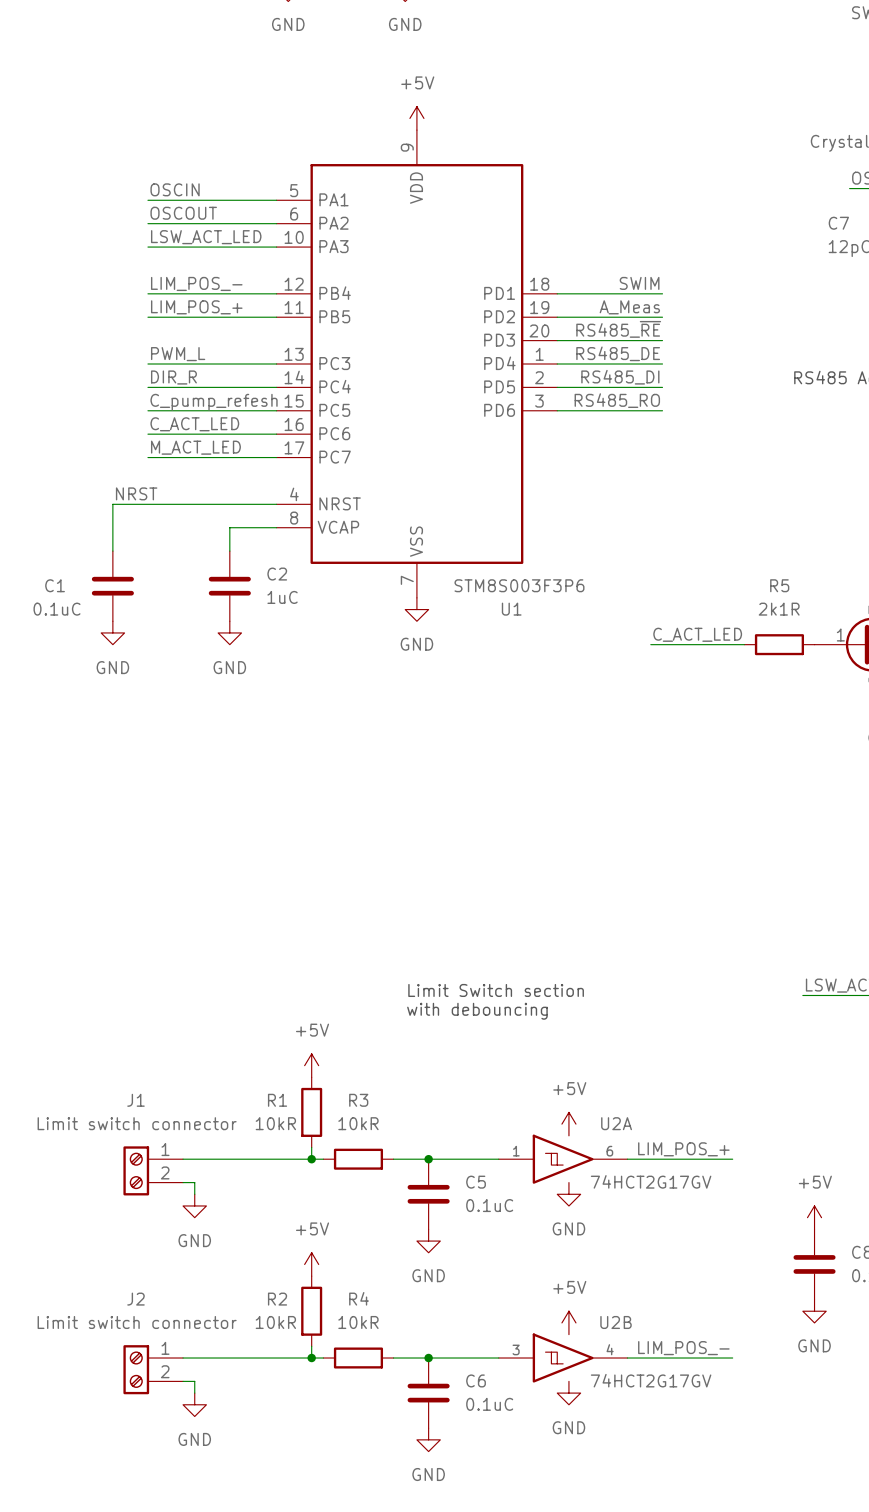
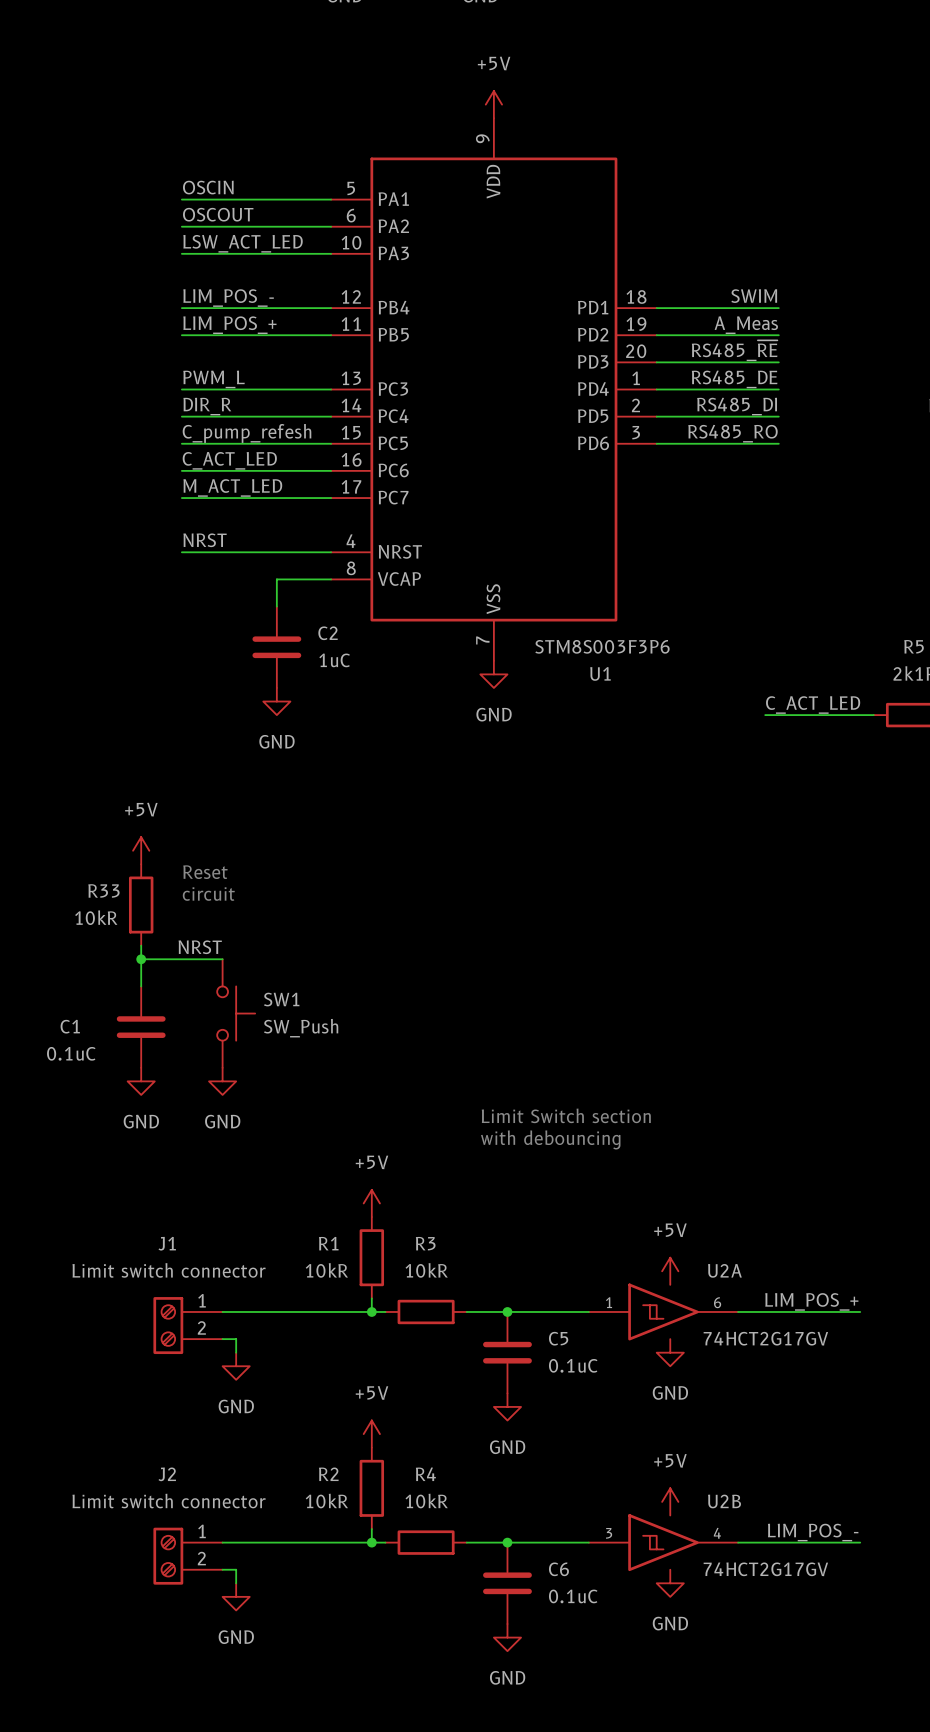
label position: NRST (136, 493) -> NRST (205, 540)
wire: (147, 504) (112, 504) (112, 551) -> none
C1 position: (112, 586) -> (141, 1027)
power symbol: GND (112, 632) -> none
power symbol: none -> +5V (141, 850)
text: none -> Reset (205, 872)
text: none -> circuit (208, 894)
R33: none -> 10kR (141, 905)
wire: none -> (141, 945) (141, 986)
label: none -> NRST (200, 947)
wire: none -> (141, 959) (222, 959)
junction: none -> (141, 959)
SW1: none -> SW_Push (236, 1013)
power symbol: none -> GND (141, 1081)
power symbol: none -> GND (222, 1081)

